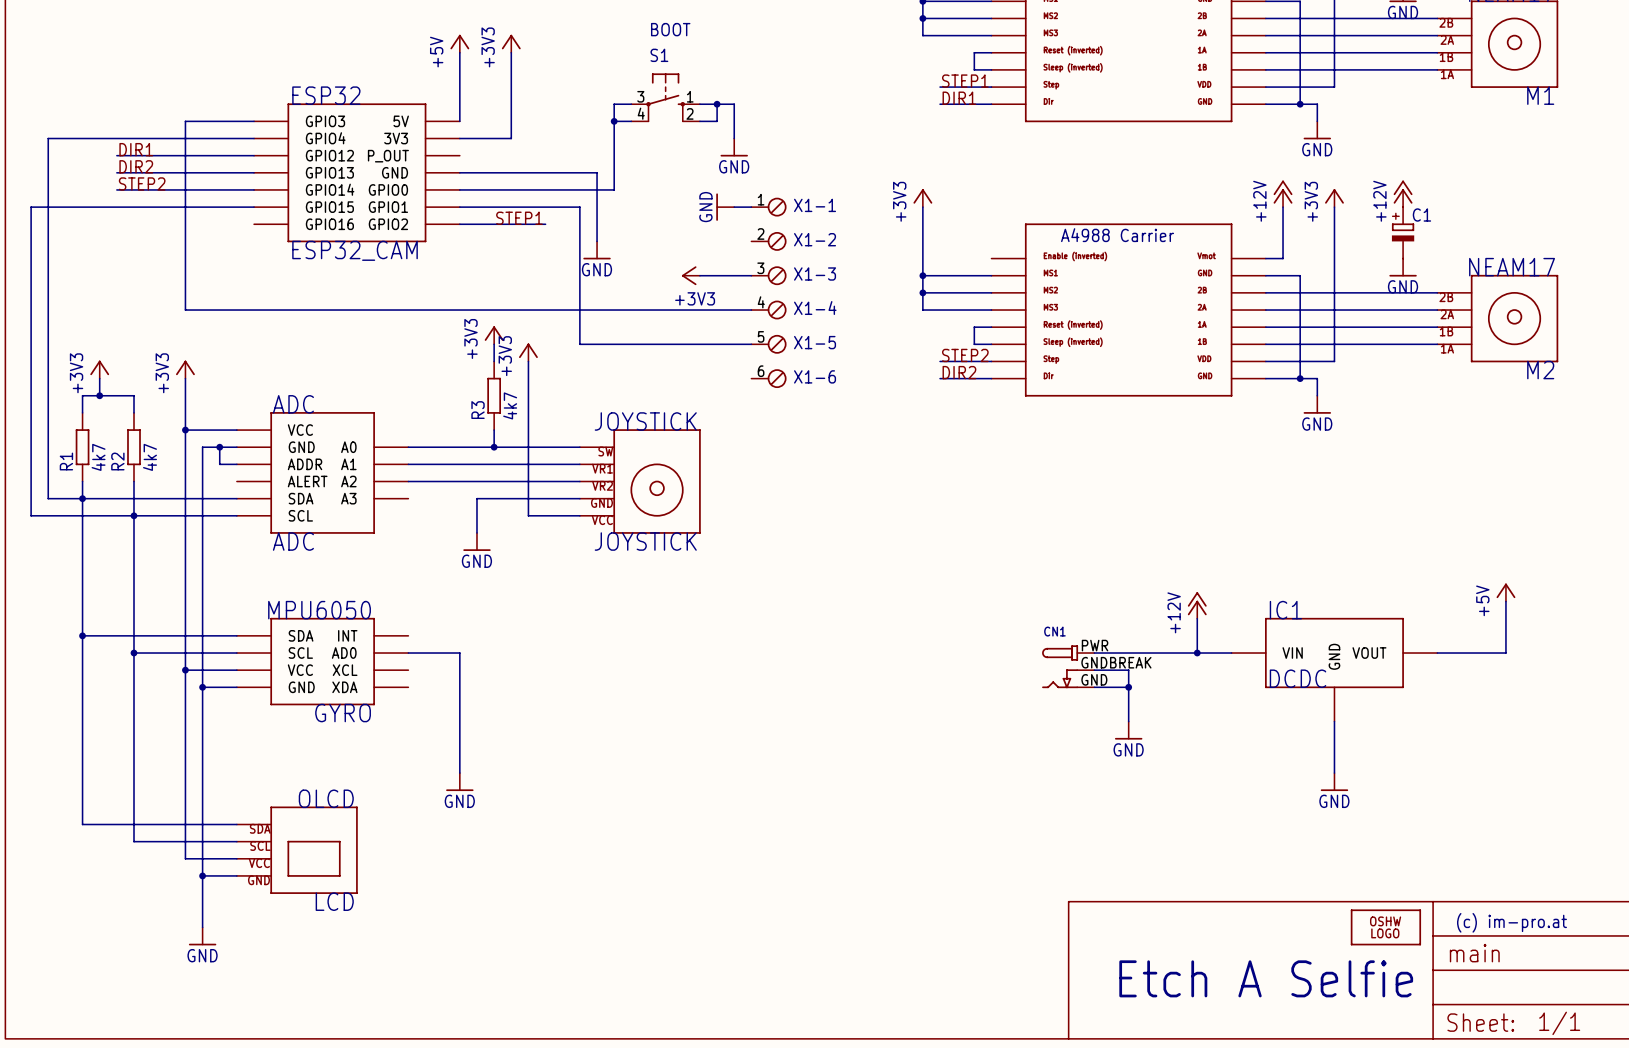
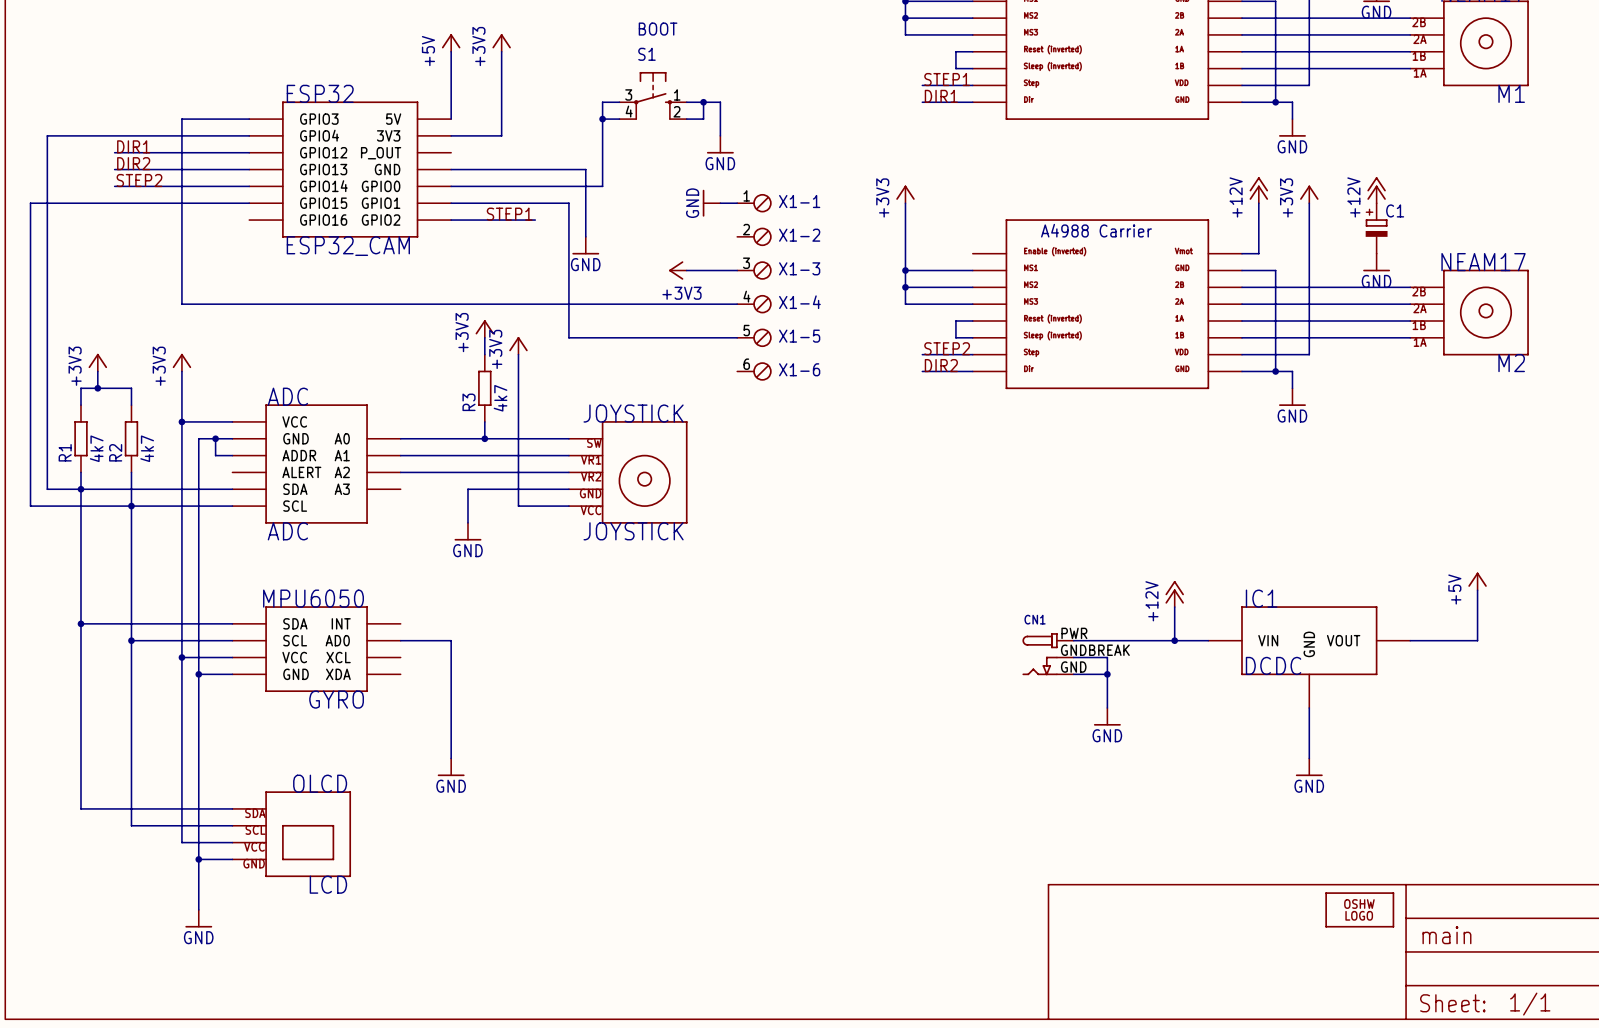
text: (c) im-pro.at (1512, 922) -> none
text: Etch A Selfie (1266, 978) -> none

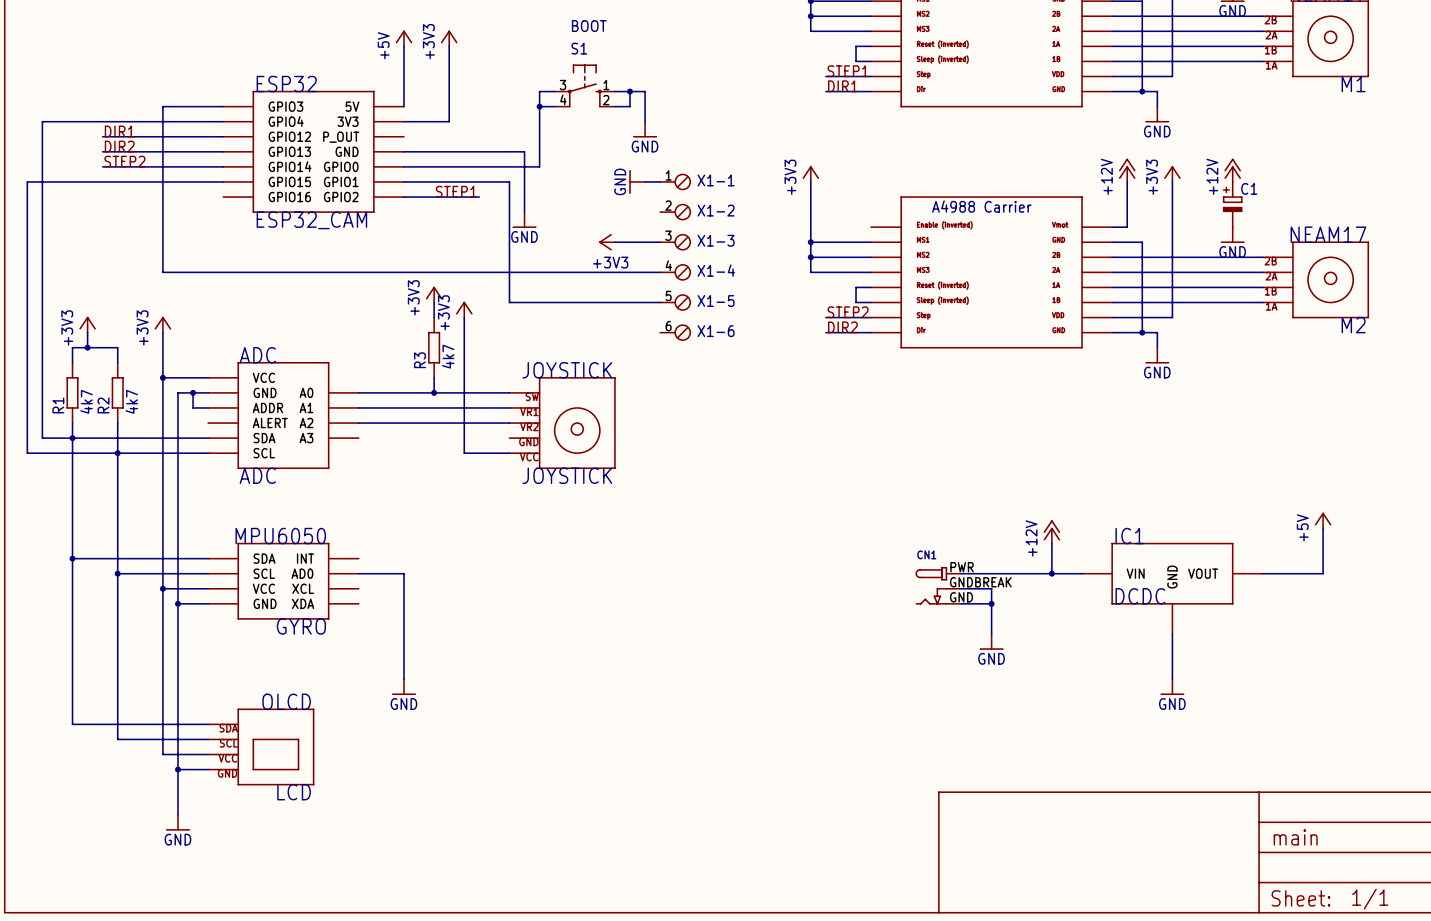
wire: (568, 489) (467, 489) (467, 522) -> none
power symbol: GND (467, 531) -> none
part: (1359, 909) -> none

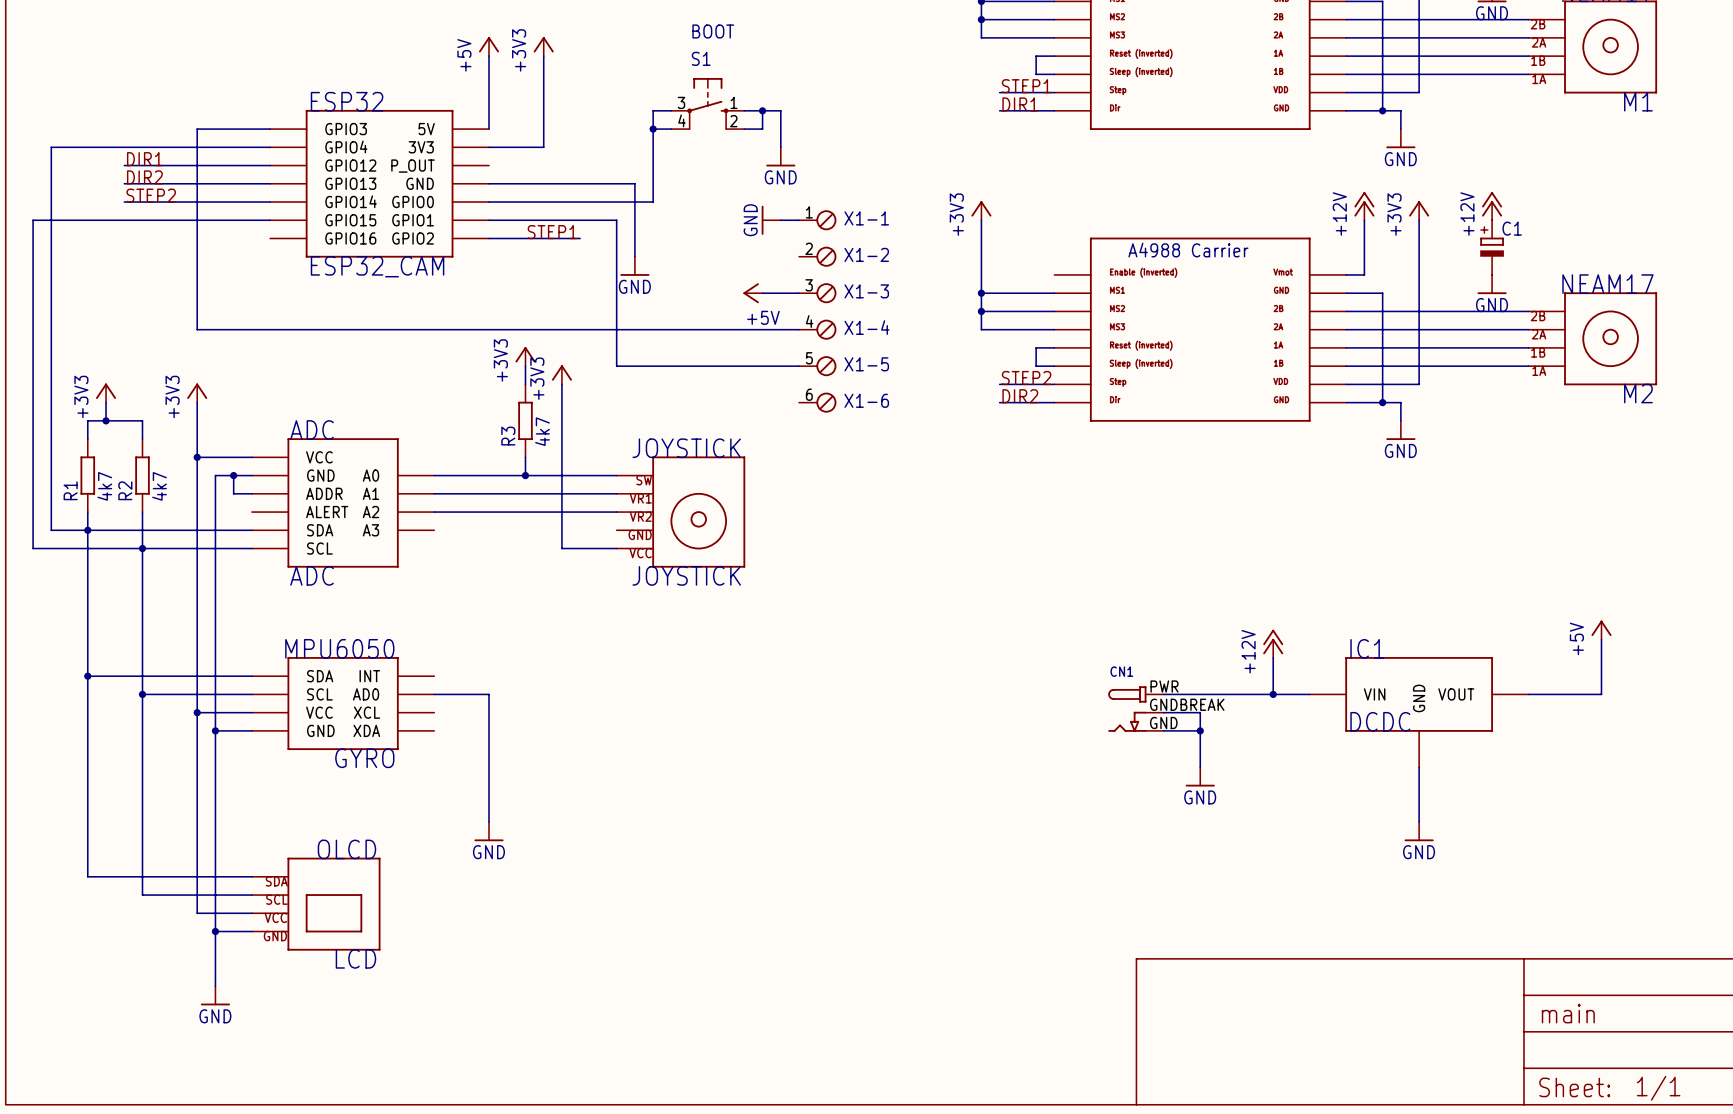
power symbol: +3V3 (607, 242) -> none
power symbol: none -> +5V (752, 293)

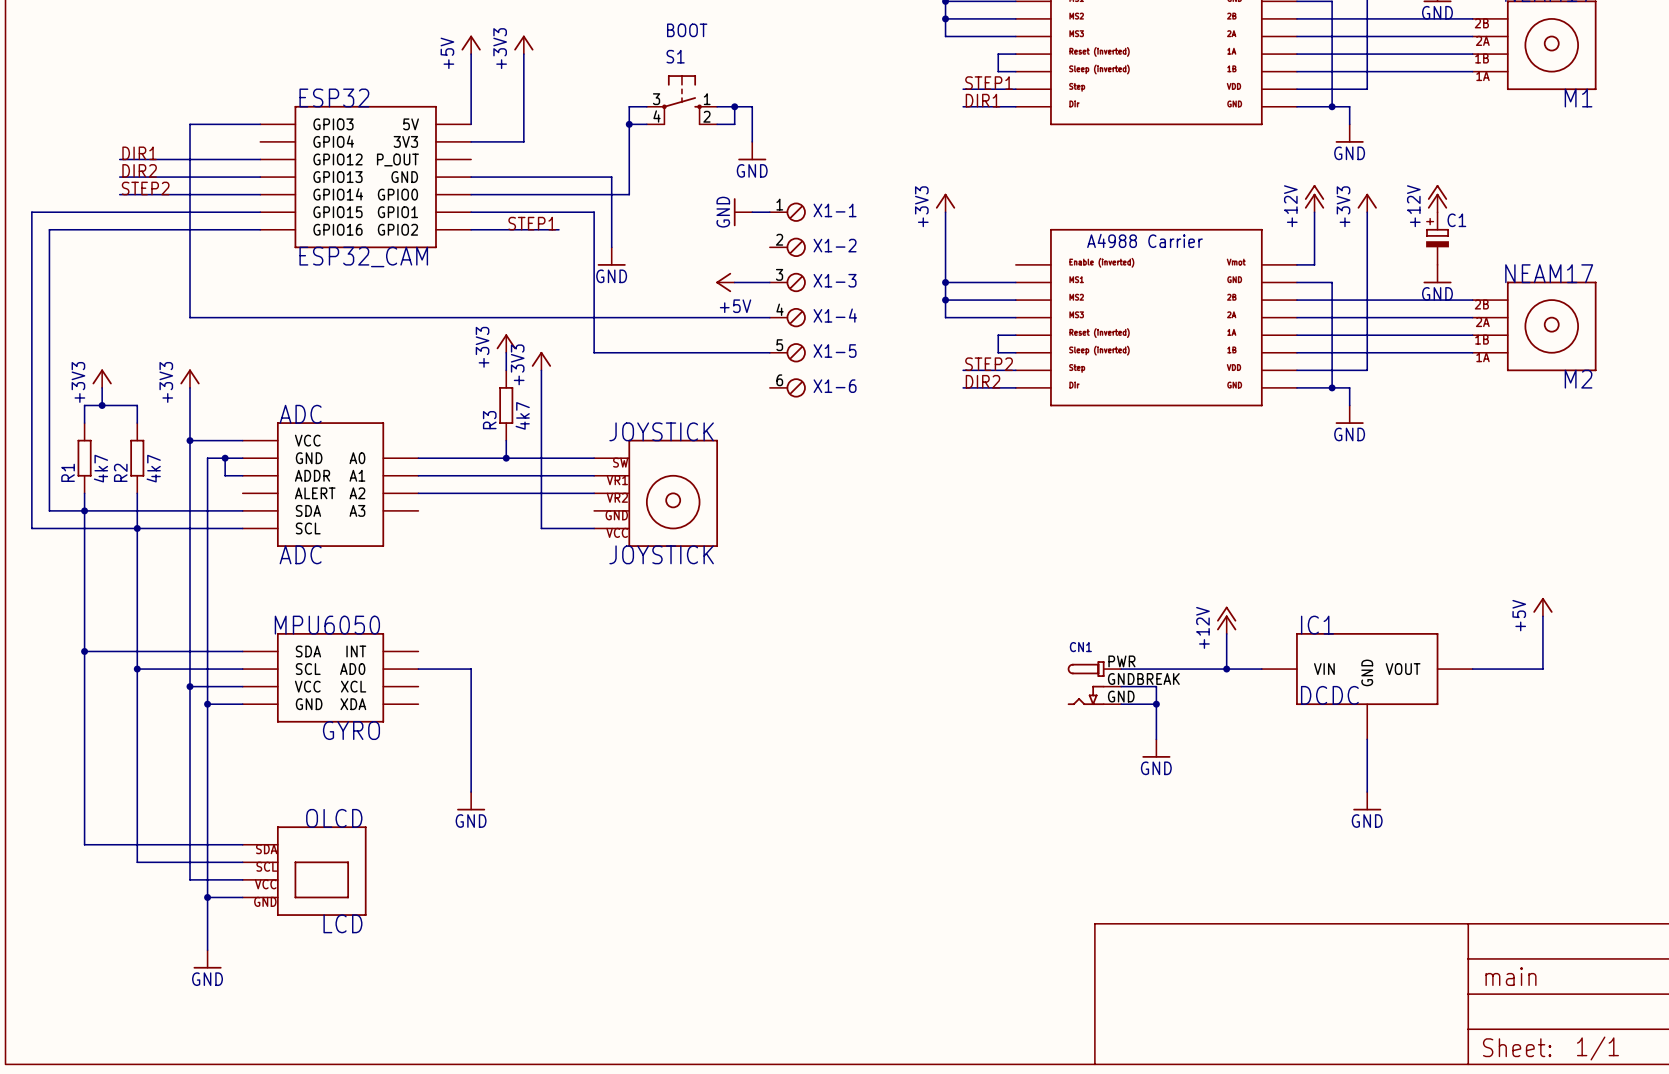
wire: (270, 147) (51, 147) (51, 238) -> (260, 229) (49, 229)

